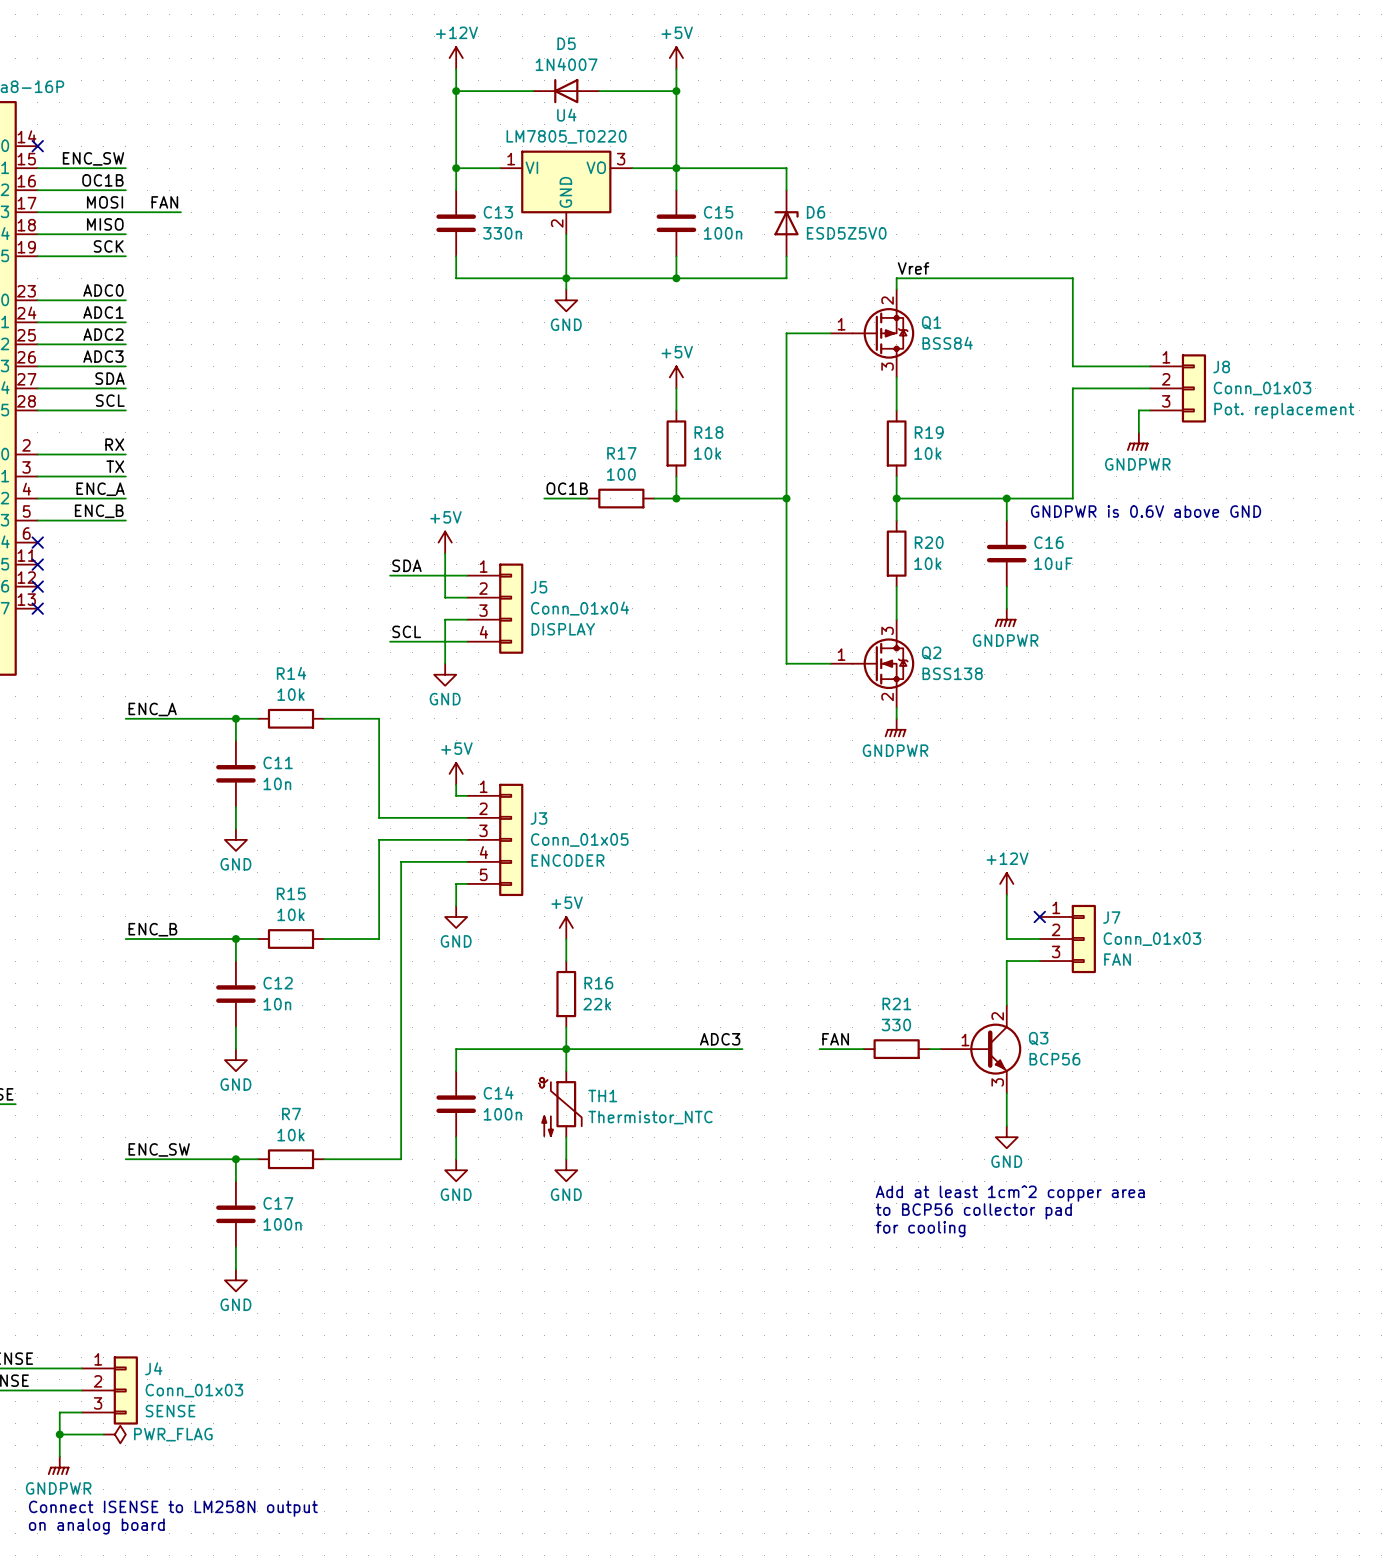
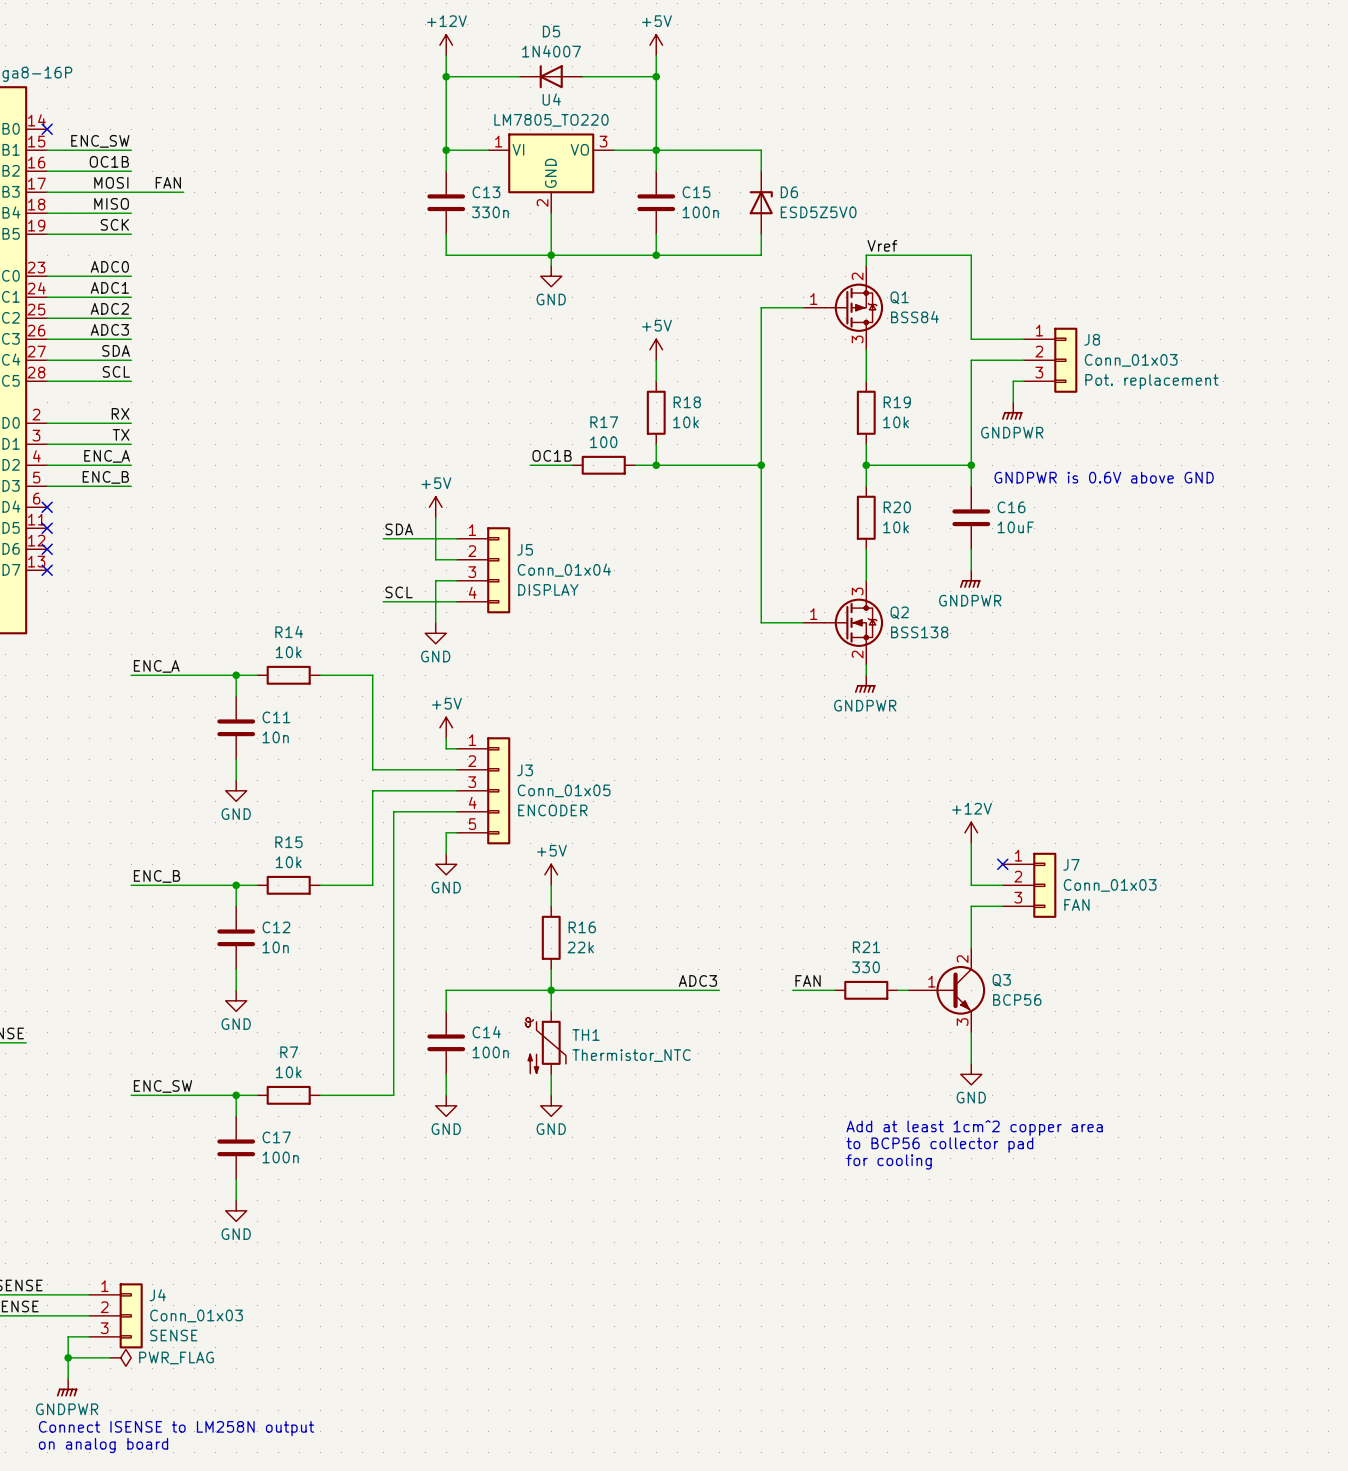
wire: (1006, 278) (1072, 278) (1072, 366) (1149, 366) -> (971, 255) (971, 339) (1023, 339)
wire: (1149, 388) (1072, 388) (1072, 498) (1006, 498) -> (1023, 360) (971, 360) (971, 465)
J8 position: (1177, 388) -> (1050, 360)
wire: (1149, 410) (1138, 410) (1138, 432) -> (1023, 381) (1013, 381) (1013, 402)
power symbol position: GNDPWR (1137, 441) -> GNDPWR (1012, 411)

